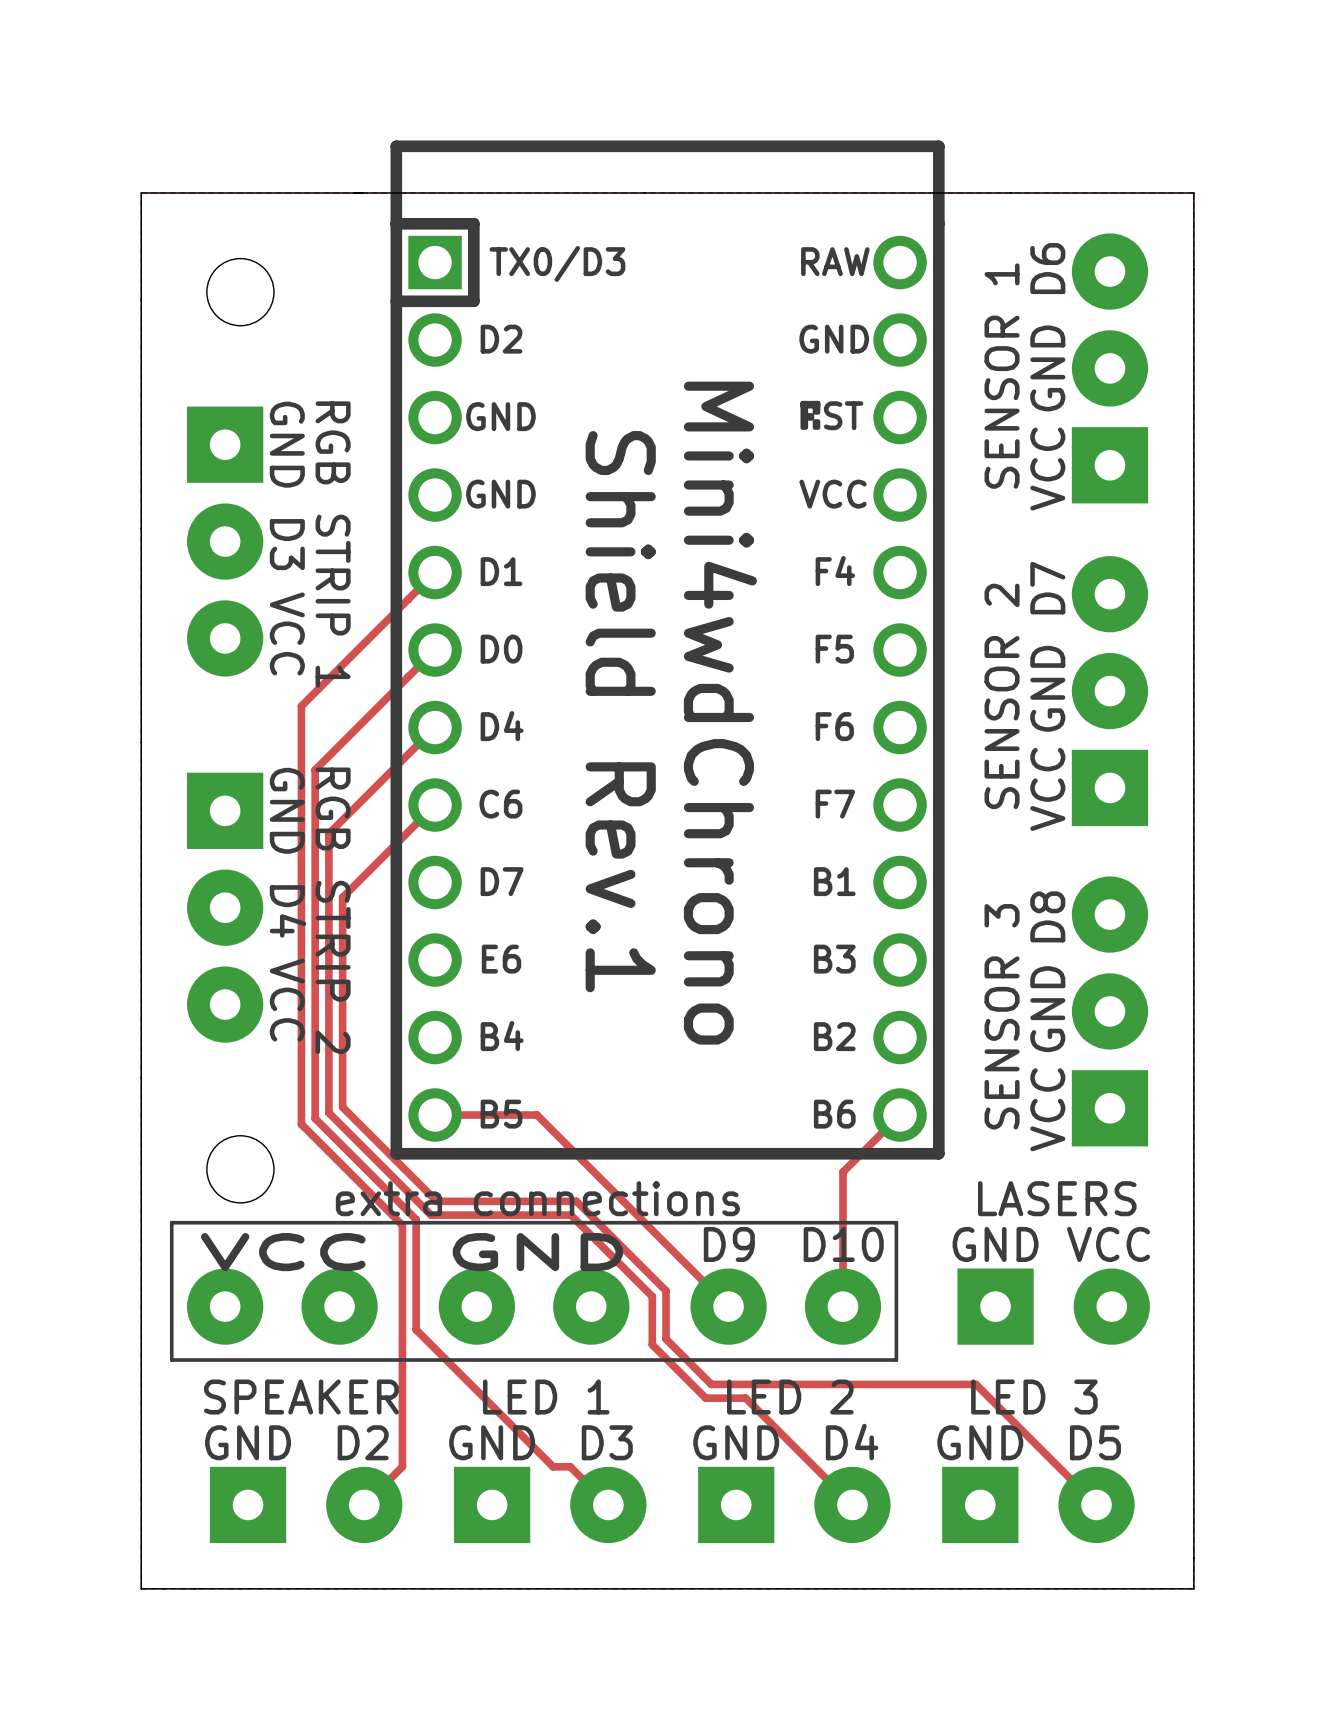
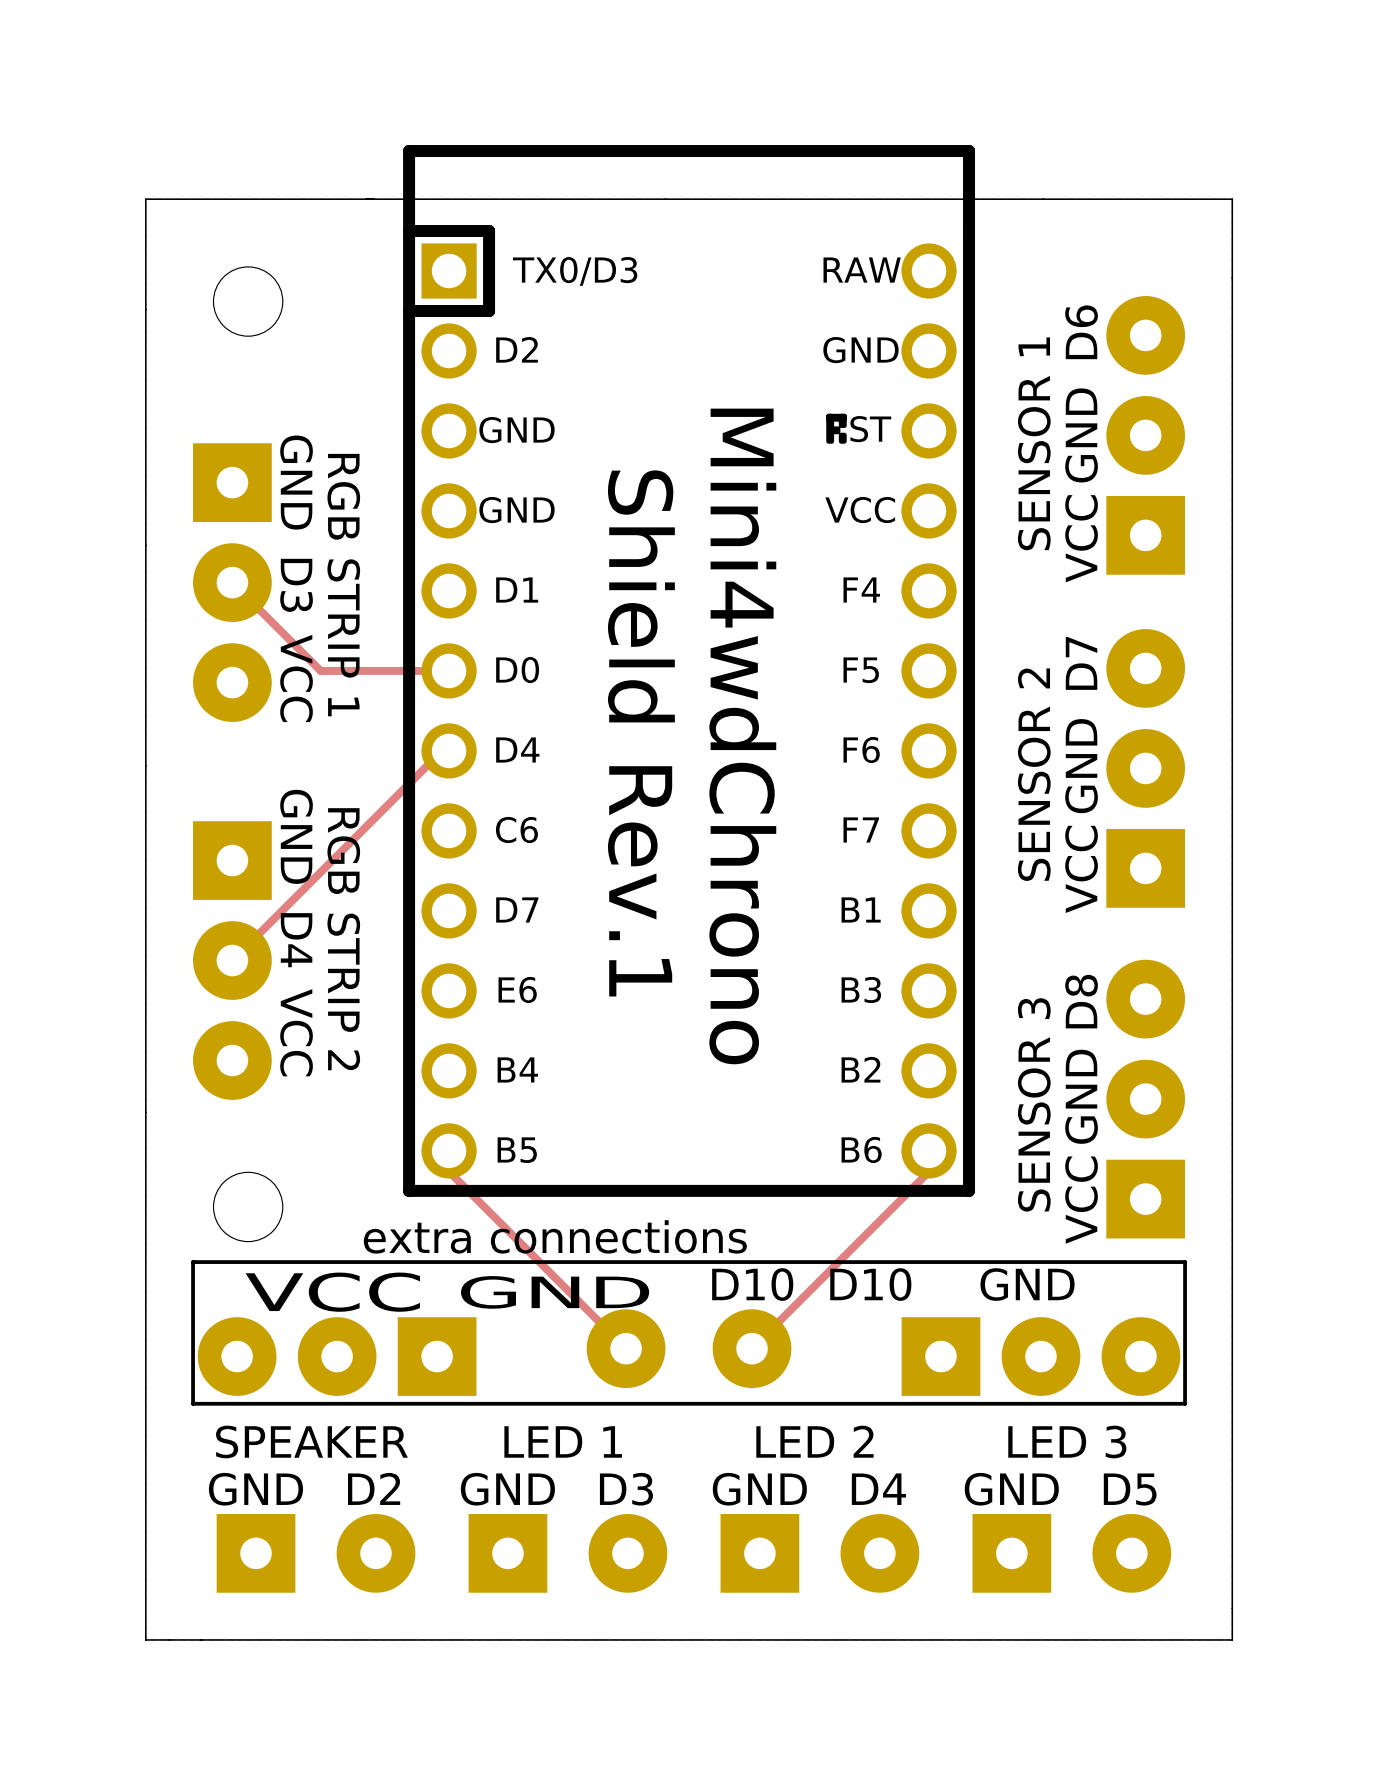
text position: D6 (1047, 268) -> D6 (1081, 332)
text position: GND (1047, 368) -> GND (1081, 435)
part position: (1109, 368) -> (1145, 435)
text position: SENSOR 1 (1002, 376) -> SENSOR 1 (1034, 443)
text position: GND (287, 444) -> GND (296, 482)
text position: VCC (1047, 469) -> VCC (1081, 538)
part position: (225, 541) -> (232, 582)
text position: D3 (287, 544) -> D3 (296, 585)
text position: RGB STRIP 1 (333, 544) -> RGB STRIP 1 (343, 585)
track: (435, 572) (301, 706) (301, 1124) (402, 1225) (402, 1466) (364, 1504) -> none
text position: D7 (1047, 588) -> D7 (1081, 663)
text position: VCC (287, 633) -> VCC (296, 678)
track: (435, 650) (315, 769) (315, 1118) (416, 1219) (416, 1329) (553, 1466) (570, 1466) (608, 1504) -> (449, 670) (320, 670) (232, 582)
text position: GND (1047, 688) -> GND (1081, 766)
part position: (1109, 691) -> (1145, 768)
text position: SENSOR 2 (1002, 696) -> SENSOR 2 (1034, 774)
track: (435, 727) (328, 833) (328, 1112) (431, 1215) (570, 1215) (652, 1296) (652, 1344) (705, 1398) (745, 1398) (852, 1504) -> (449, 750) (441, 750) (232, 960)
text position: VCC (1047, 789) -> VCC (1081, 869)
track: (435, 805) (342, 897) (342, 1107) (436, 1201) (576, 1201) (666, 1290) (666, 1339) (711, 1384) (976, 1384) (1096, 1504) -> none
part position: (225, 907) -> (232, 960)
text position: D8 (1047, 916) -> D8 (1081, 1001)
text position: GND (1047, 1009) -> GND (1081, 1096)
part position: (1109, 1011) -> (1145, 1099)
text position: SENSOR 3 (1002, 1016) -> SENSOR 3 (1034, 1104)
text: VCC (1047, 1109) -> none
track: (435, 1115) (536, 1115) (728, 1306) -> (929, 1171) (752, 1348)
track: (900, 1115) (843, 1172) (843, 1306) -> none
track: none -> (449, 1171) (626, 1348)
text: none -> VCC (1081, 1200)
text: LASERS (1057, 1198) -> none
line: (187, 1222) (171, 1222) (171, 1360) (187, 1360) -> (193, 1262) (193, 1403)
line: (896, 1222) (896, 1360) -> (925, 1262) (1185, 1262) (1185, 1403) (925, 1403)
text: D9 (729, 1244) -> D10 (752, 1284)
text: VCC (1108, 1244) -> none
text position: VCC (283, 1252) -> VCC (332, 1292)
part footprint: [301, 1268, 378, 1345] -> [197, 1317, 477, 1396]
part: (225, 1306) -> none
part: (476, 1306) -> none
part position: (591, 1306) -> (626, 1348)
part: (843, 1306) -> none
part: (1053, 1306) -> none
part: none -> (1040, 1356)

